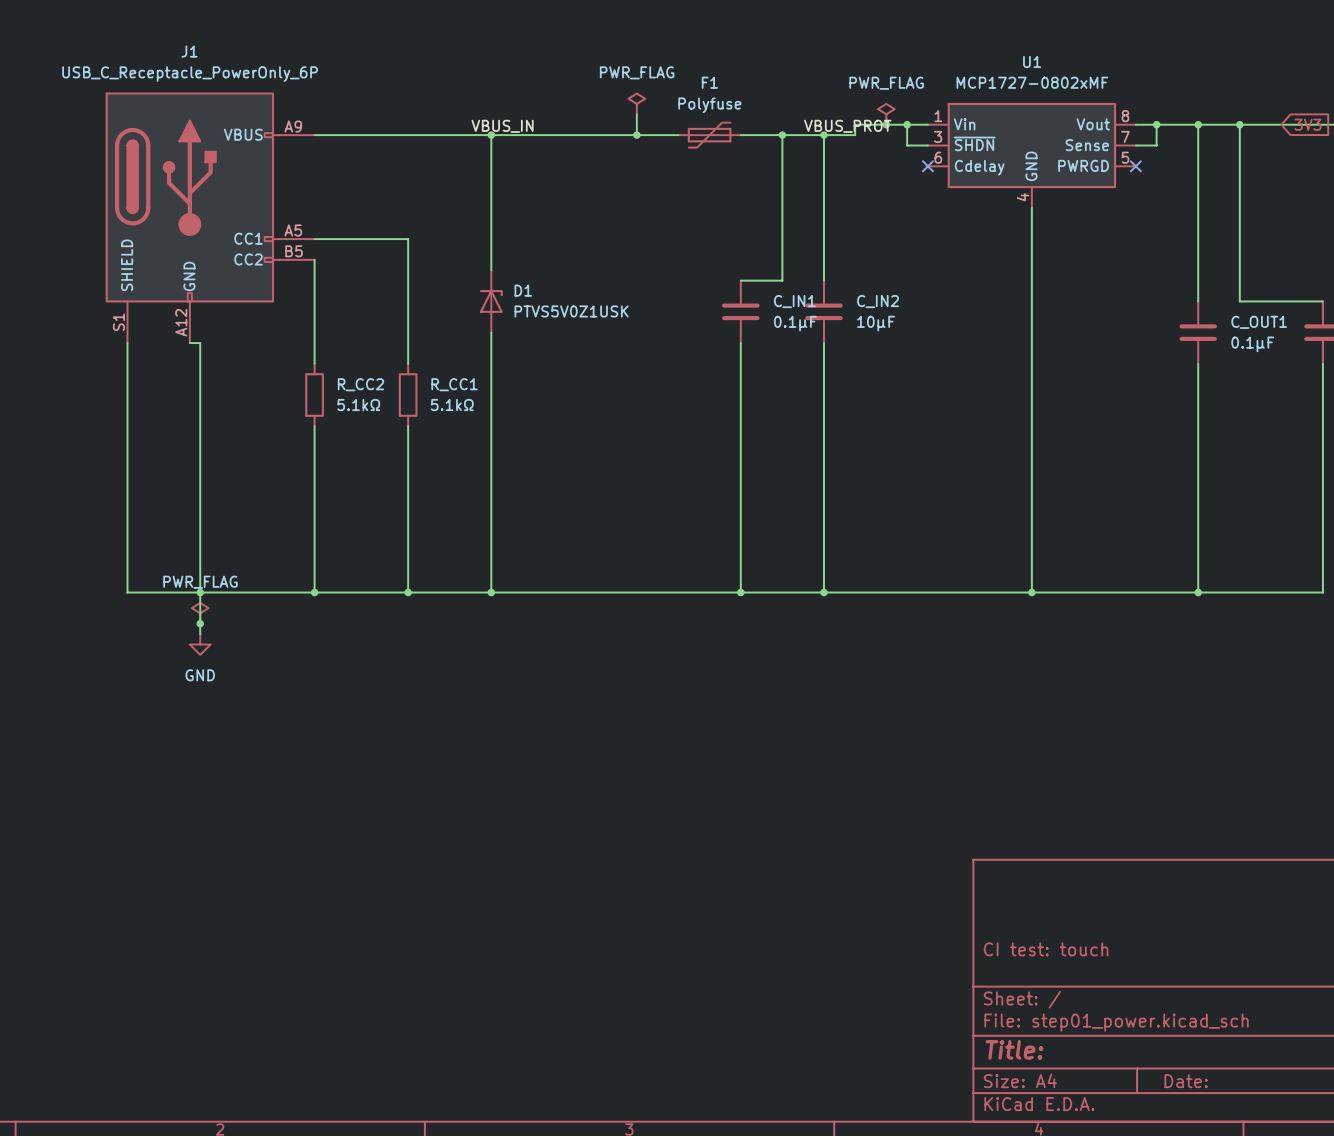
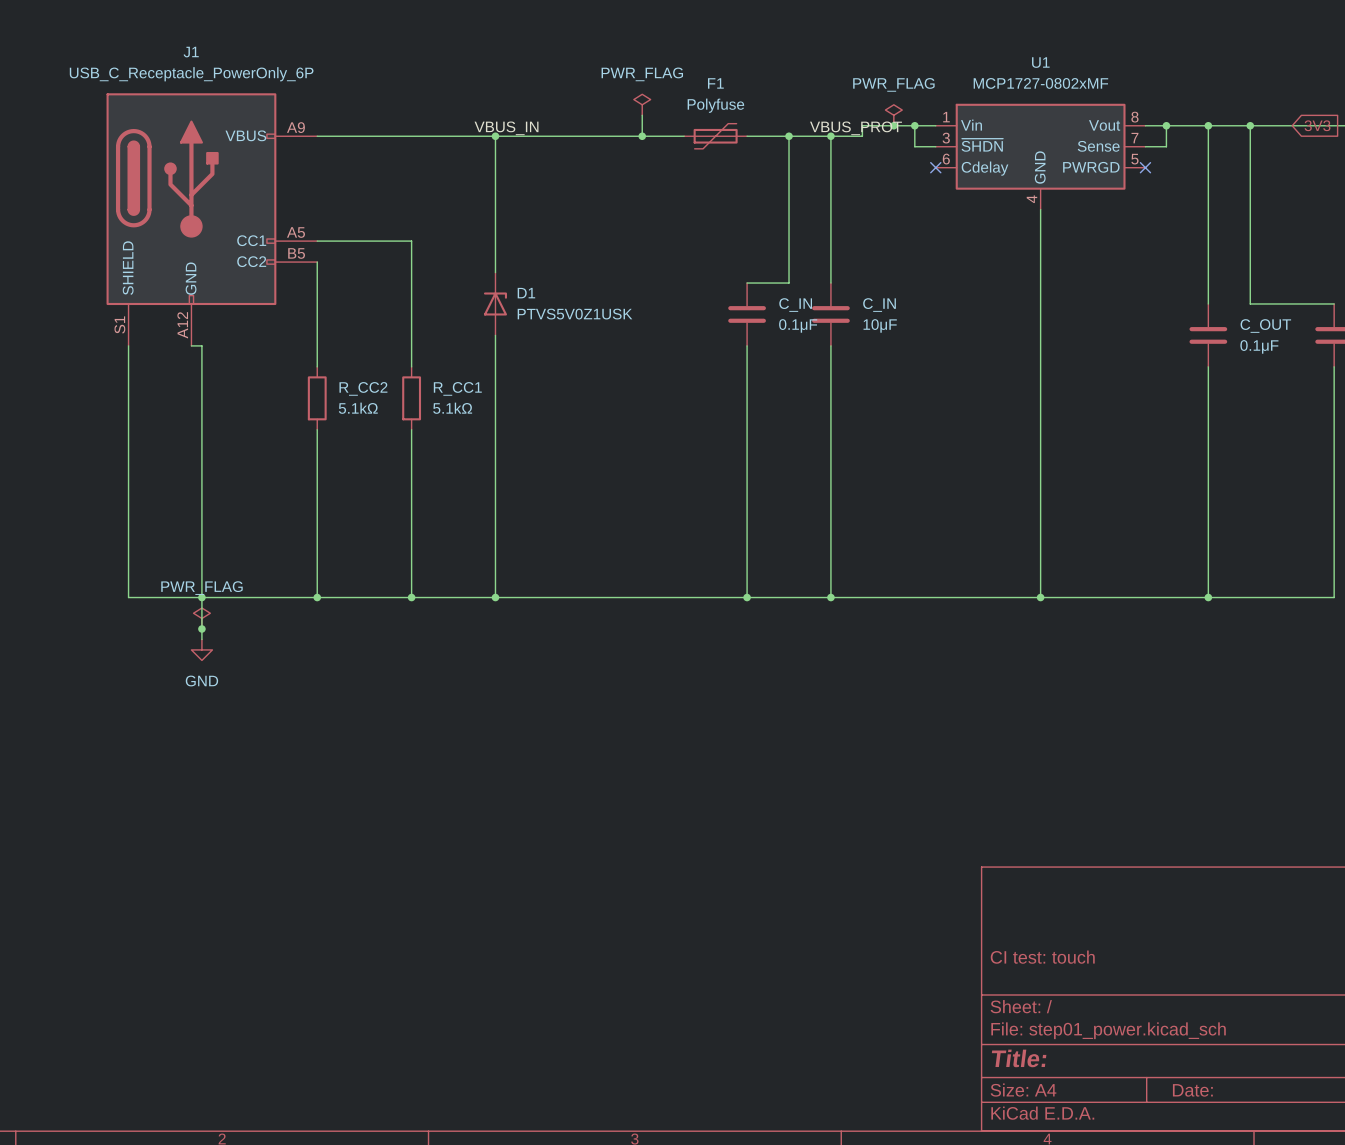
C_IN1 name: C_IN1 (794, 301) -> C_IN (795, 305)
C_IN2 name: C_IN2 (878, 301) -> C_IN (879, 305)
C_OUT1 name: C_OUT1 (1259, 322) -> C_OUT (1265, 326)

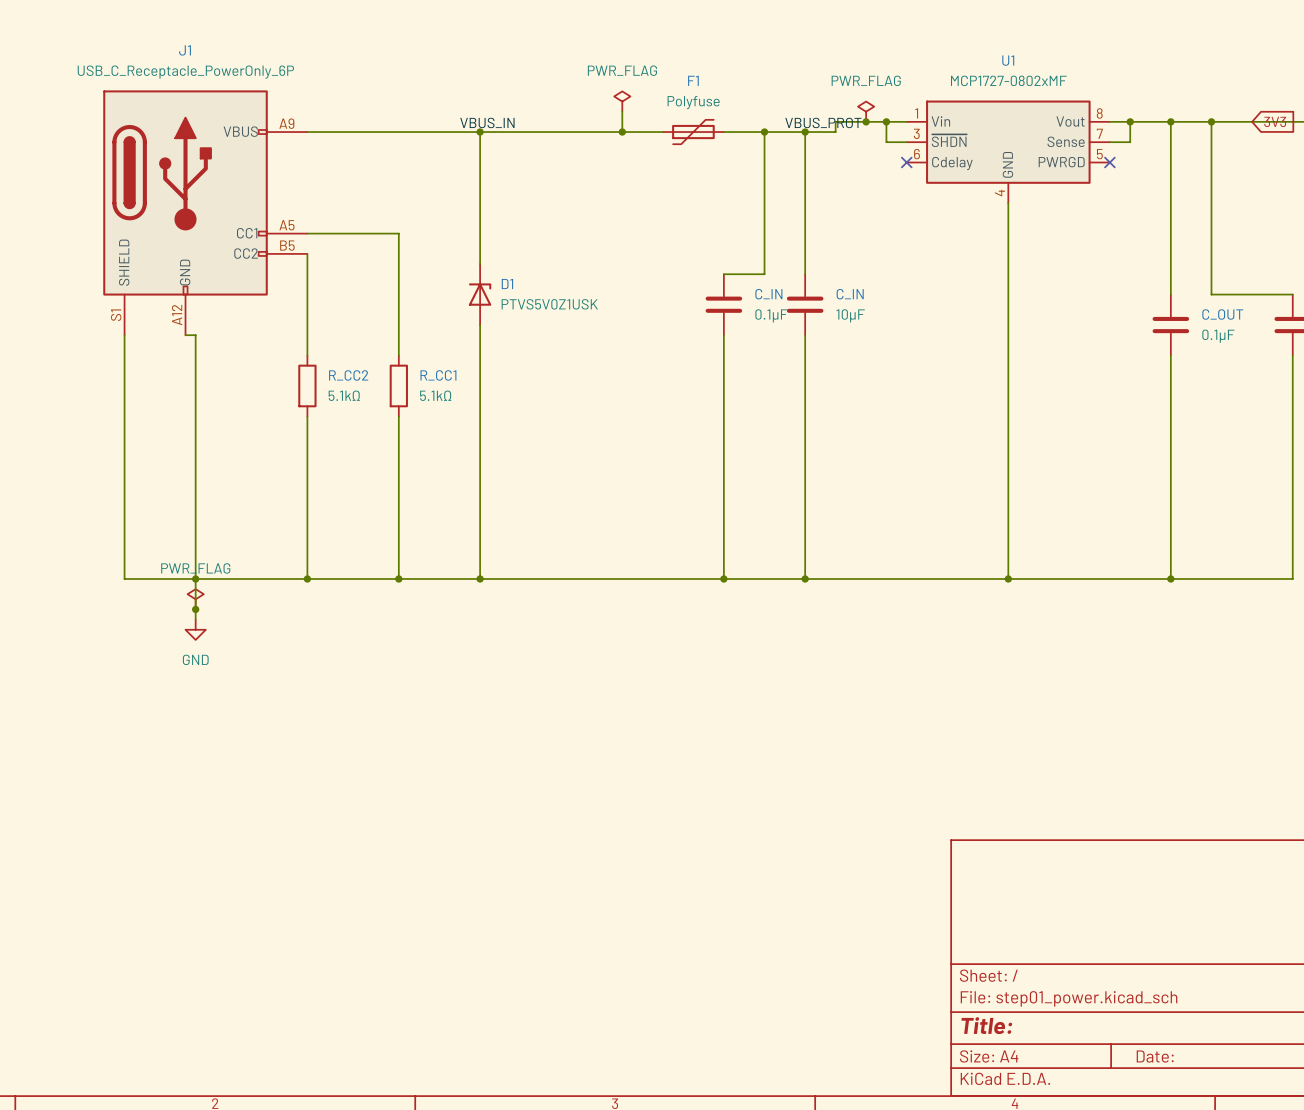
title block: CI test: touch (1042, 957) -> none

